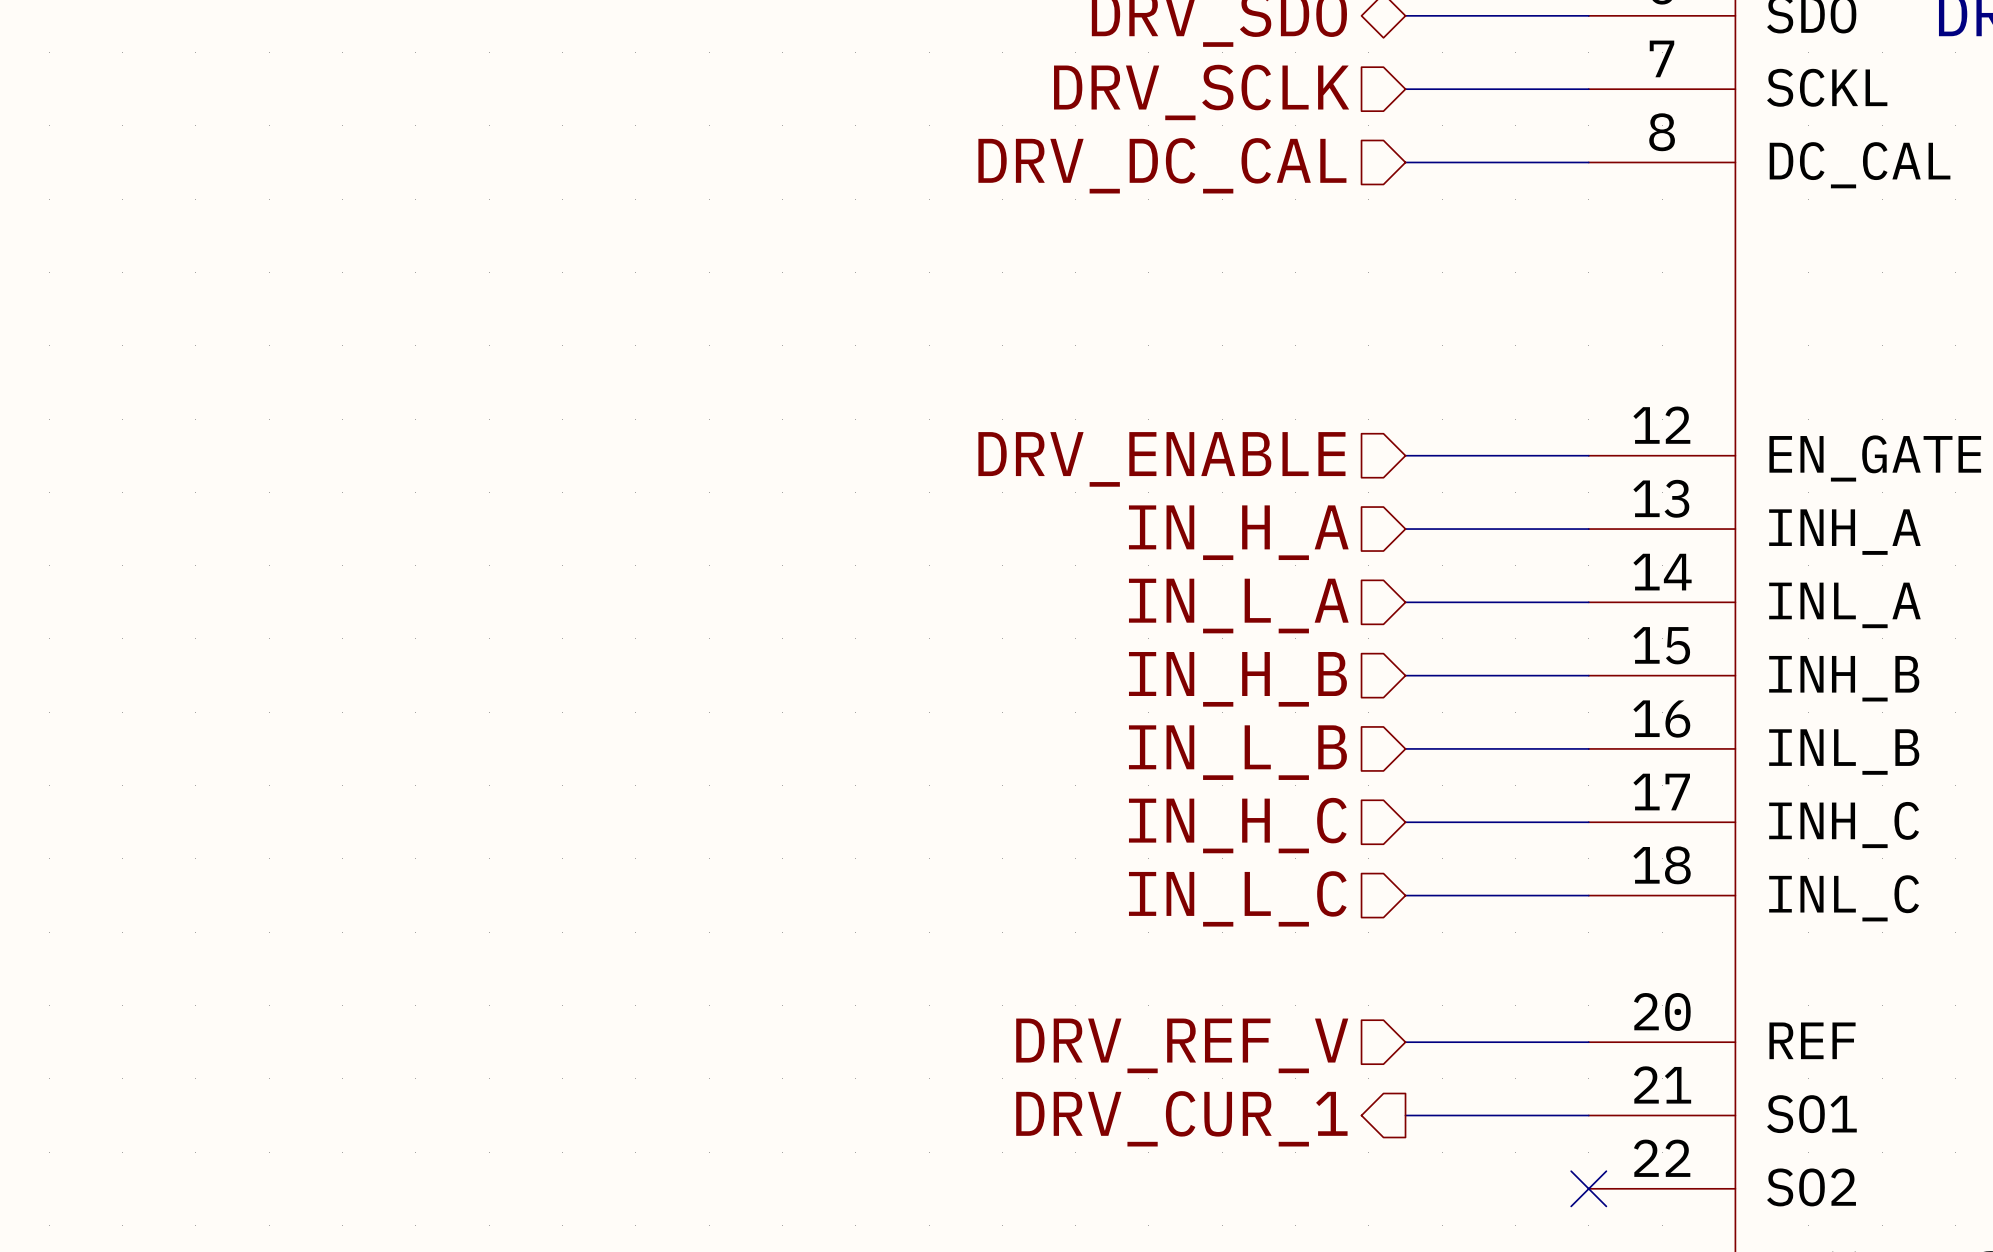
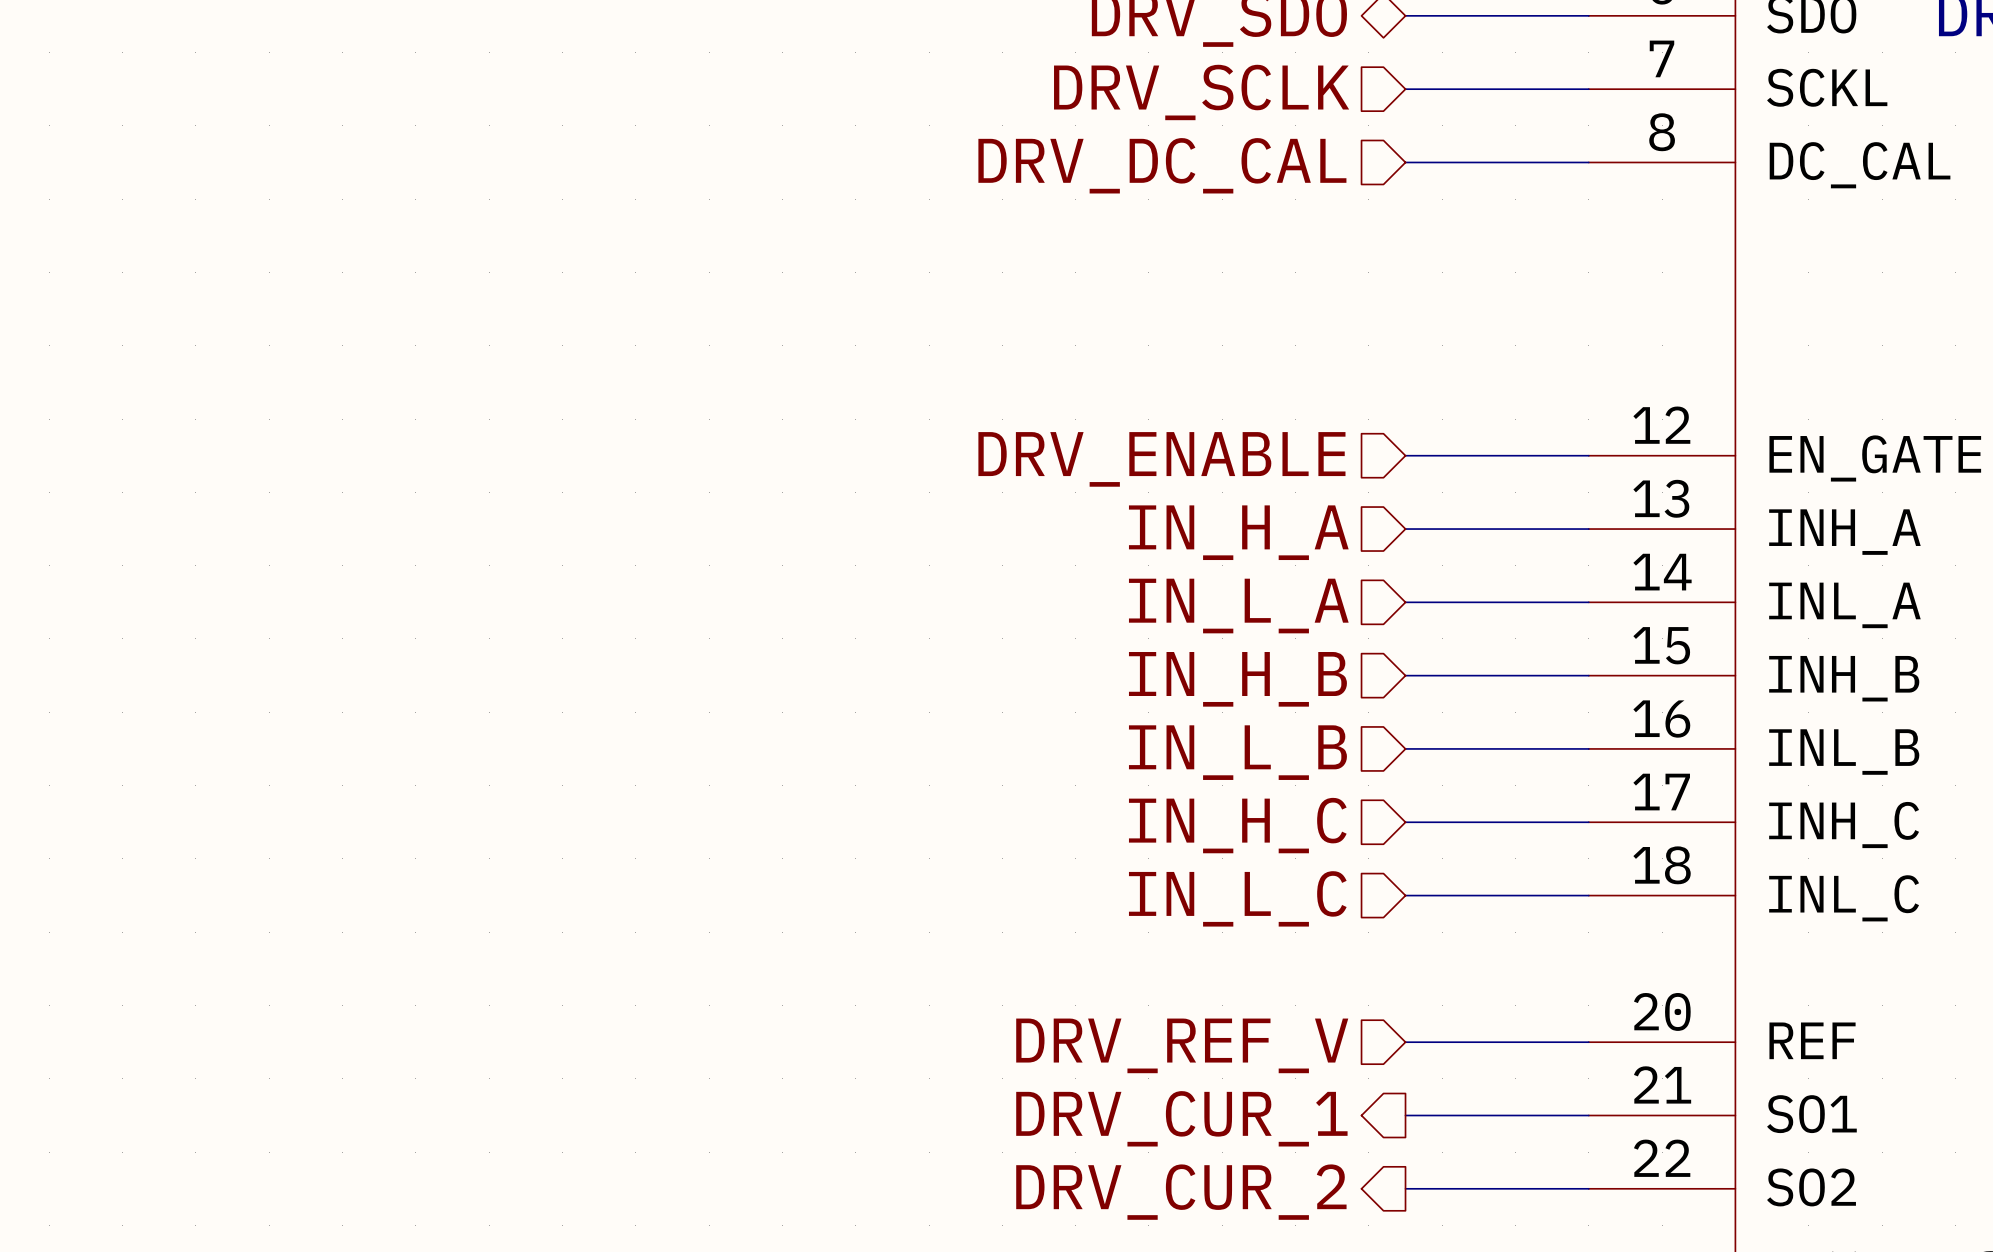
wire: none -> (1405, 1188) (1588, 1188)
no-connect mark: (1588, 1188) -> none
hierarchical label: none -> DRV_CUR_2 (1181, 1192)

